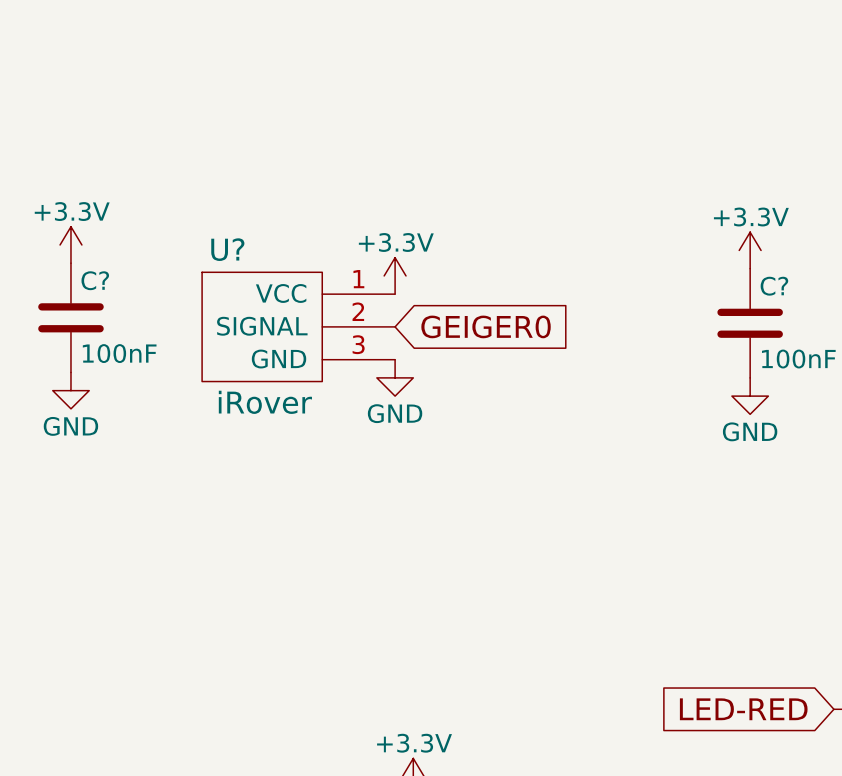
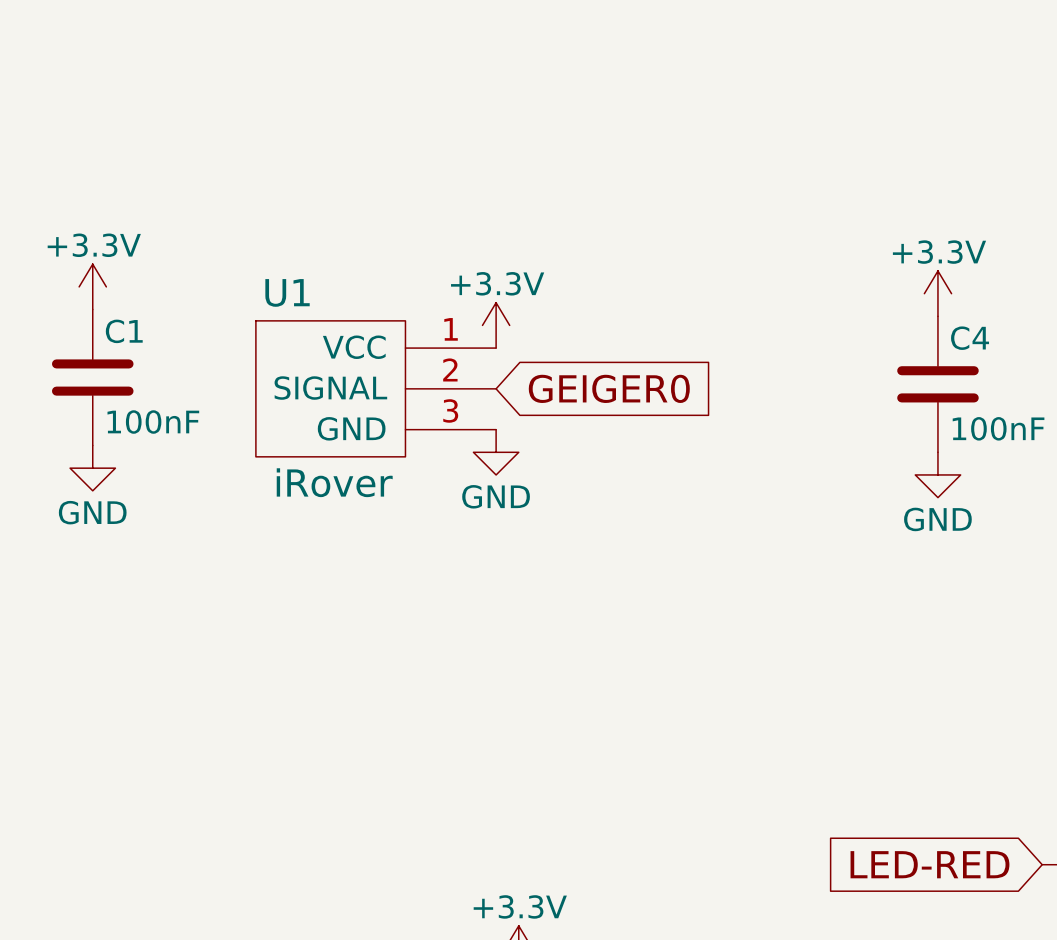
U? name: U? (227, 249) -> U1 (287, 292)
C? name: C? (95, 280) -> C1 (124, 331)
C? name: C? (774, 286) -> C4 (970, 338)

